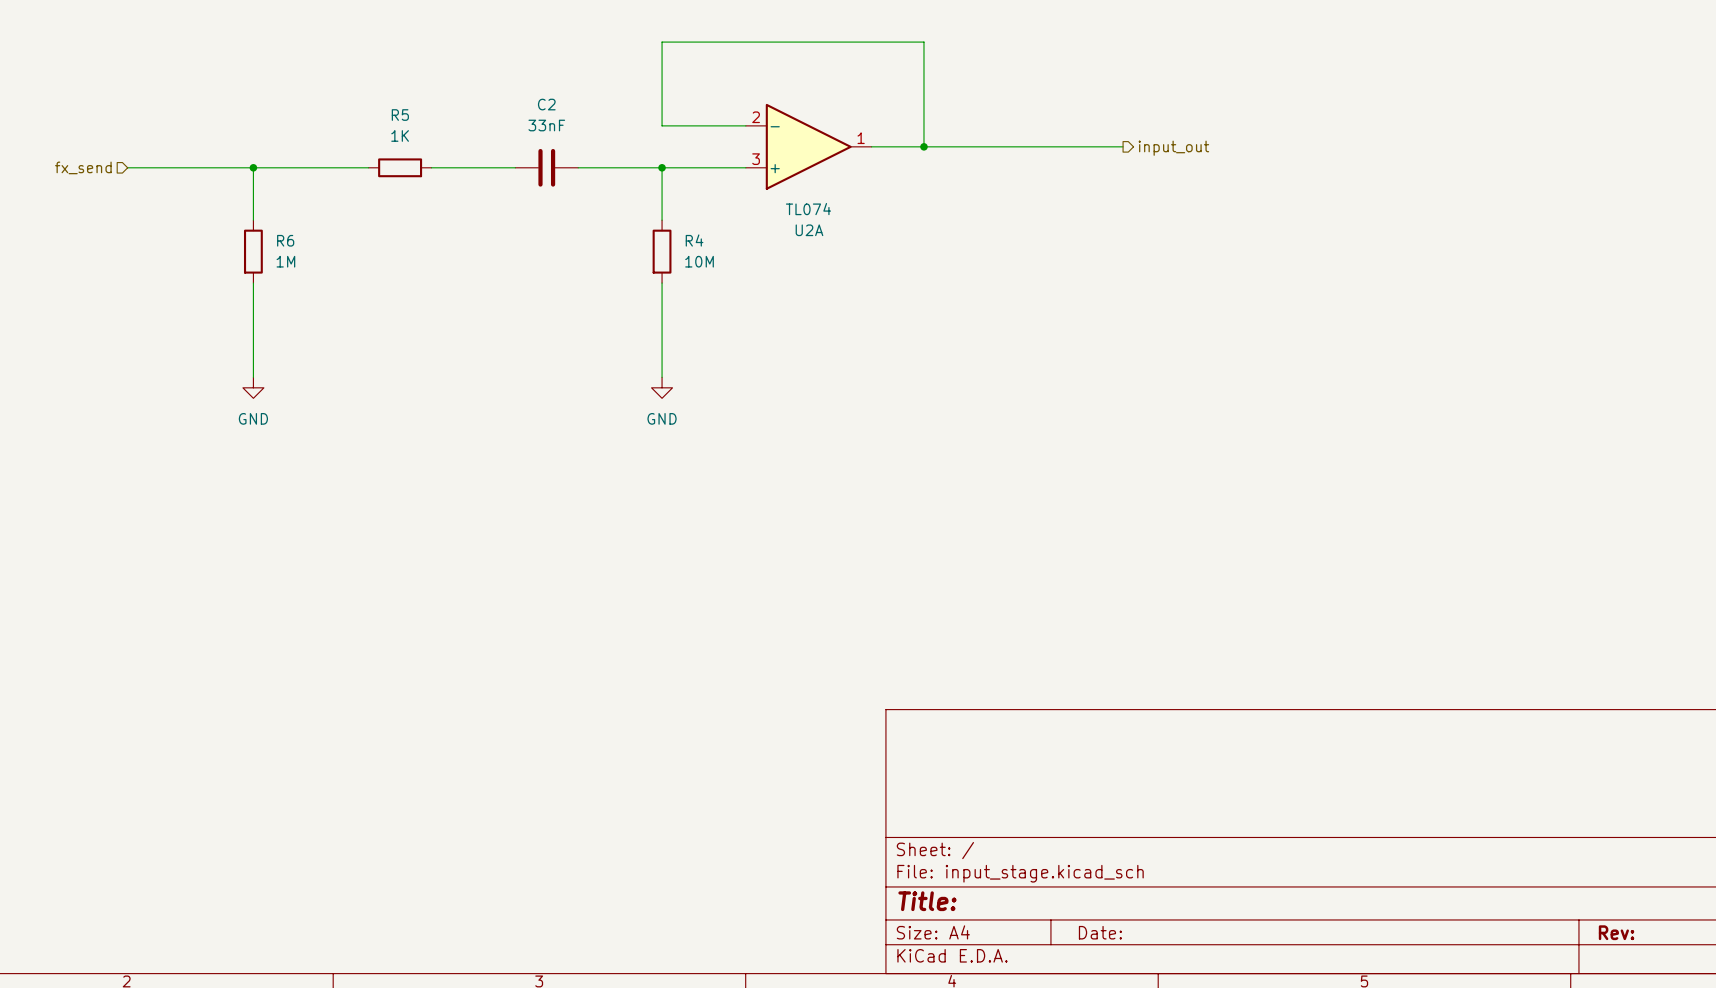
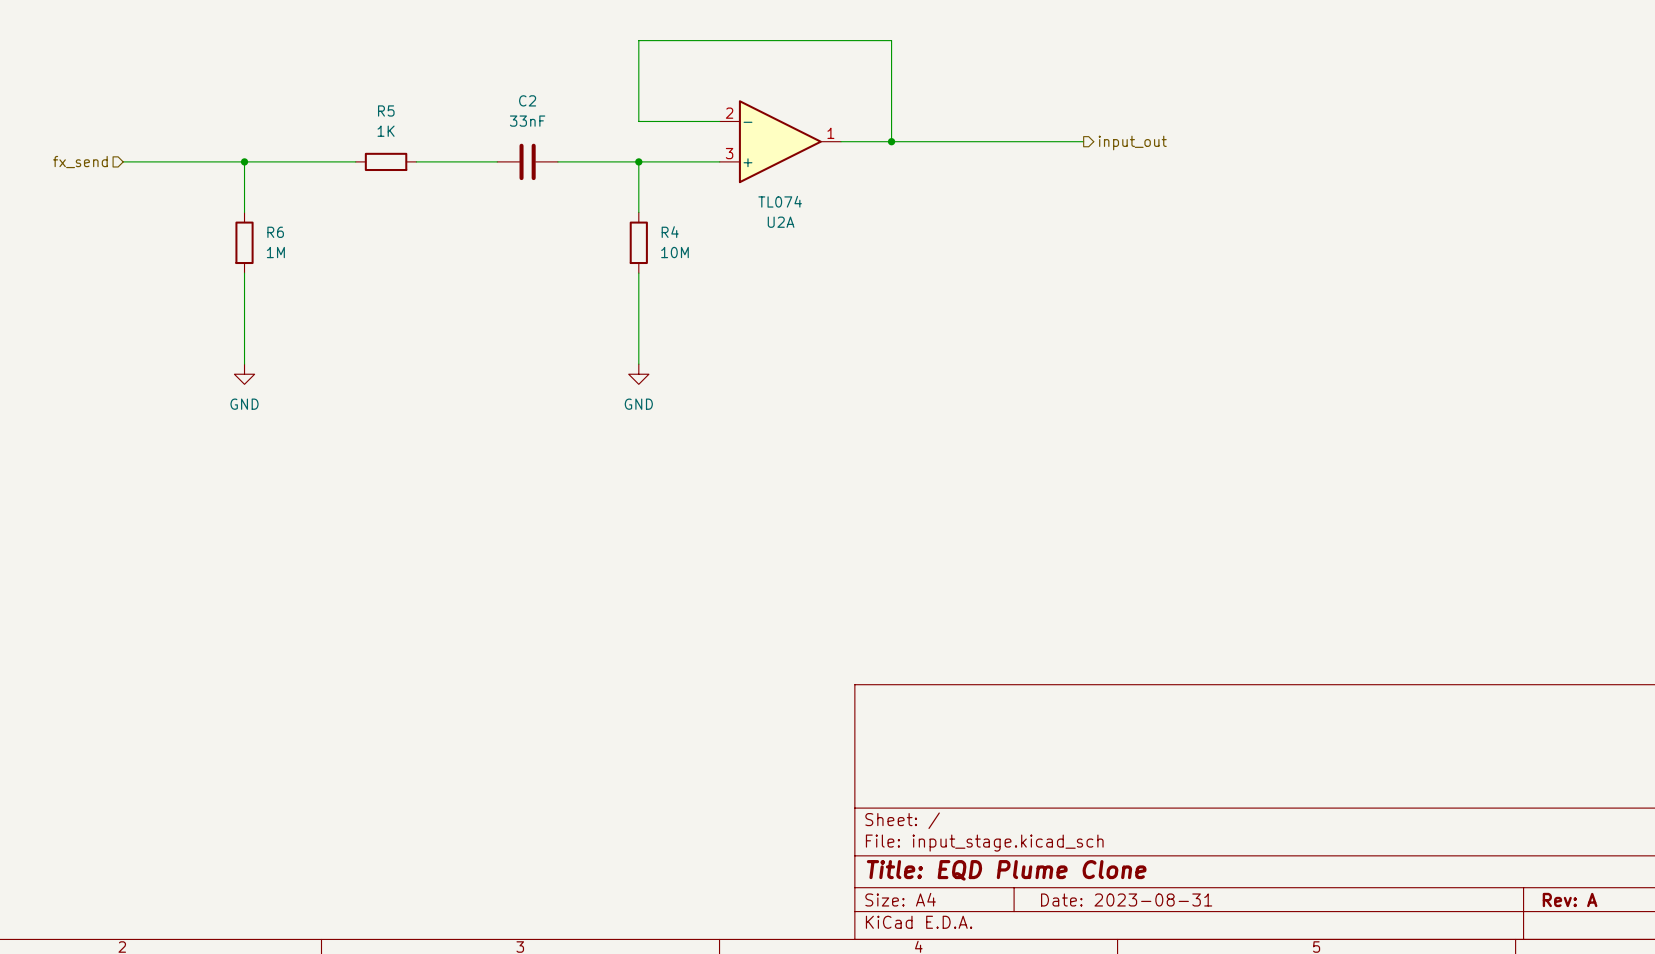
title block: Title: (927, 901) -> Title: EQD Plume Clone (1006, 870)
title block: Date: (1100, 932) -> Date: 2023-08-31 (1126, 899)
title block: Rev: (1616, 932) -> Rev: A (1570, 899)

